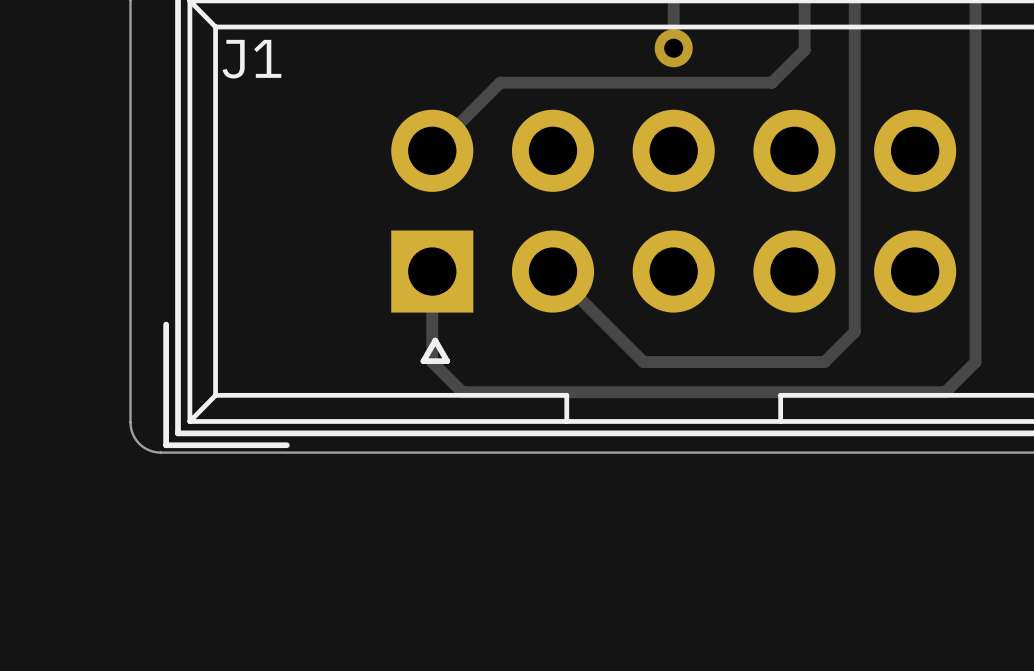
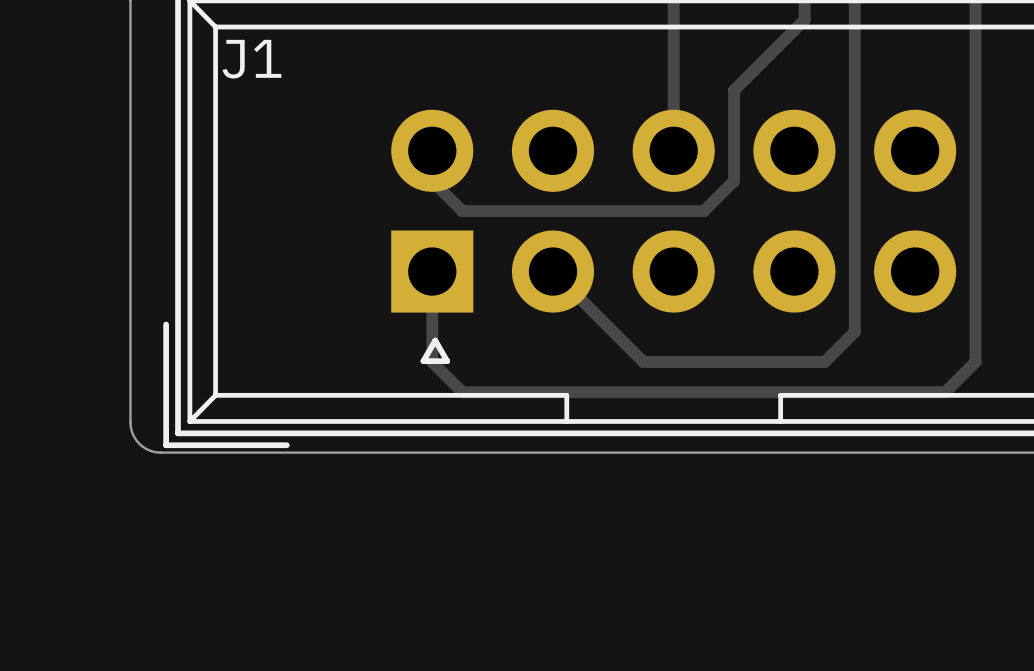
track: (804, 19) (804, 50) (772, 82) (500, 82) (432, 150) -> (804, 19) (734, 90) (734, 181) (703, 211) (462, 211) (432, 181) (432, 150)
track: none -> (673, 48) (673, 150)
via: (673, 48) -> none

